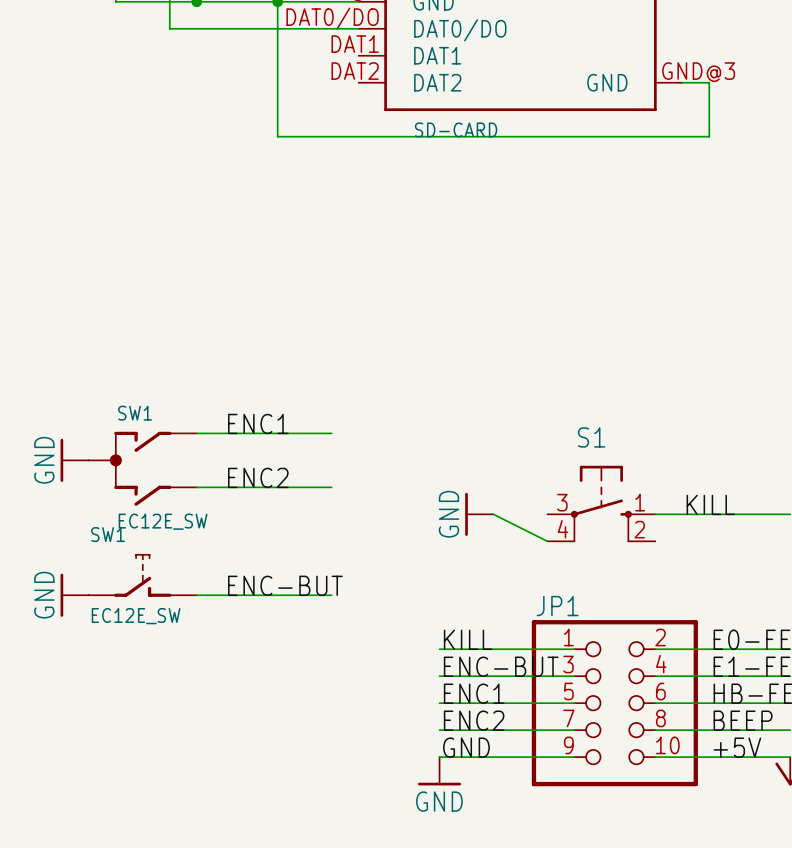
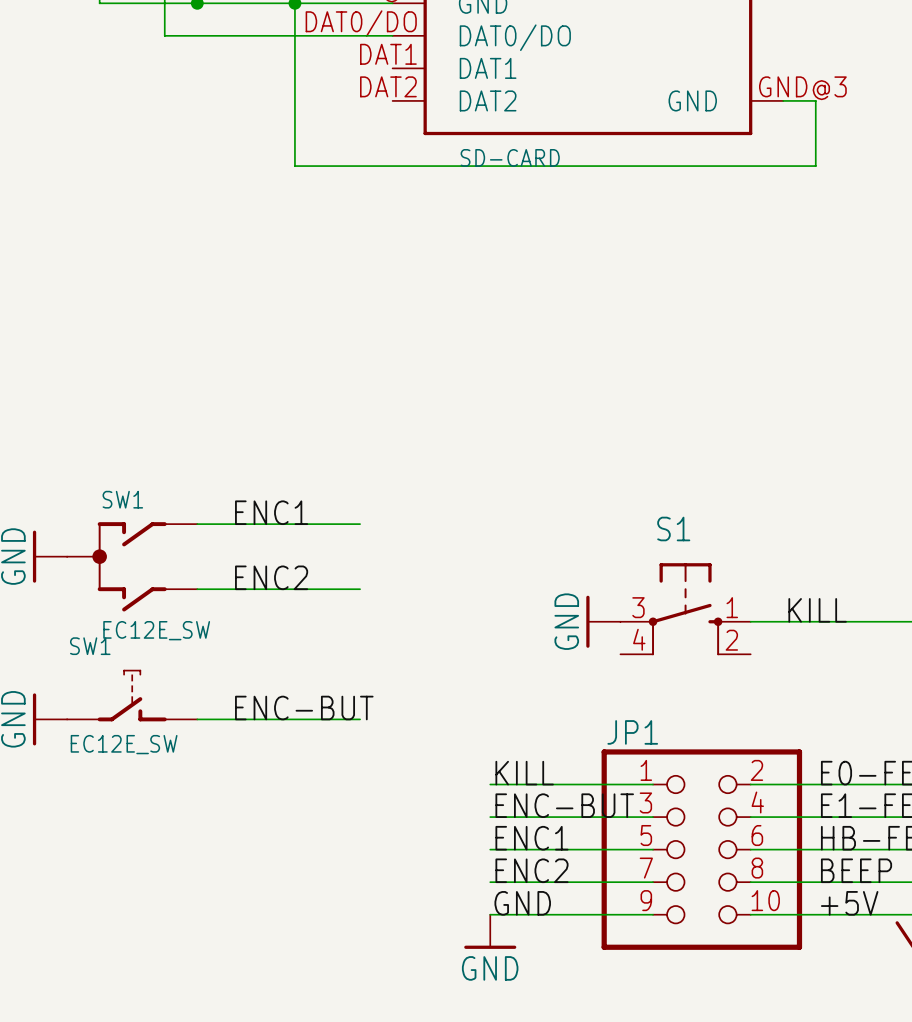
power symbol position: GND (479, 514) -> GND (603, 621)
wire: (493, 514) (547, 541) -> none

